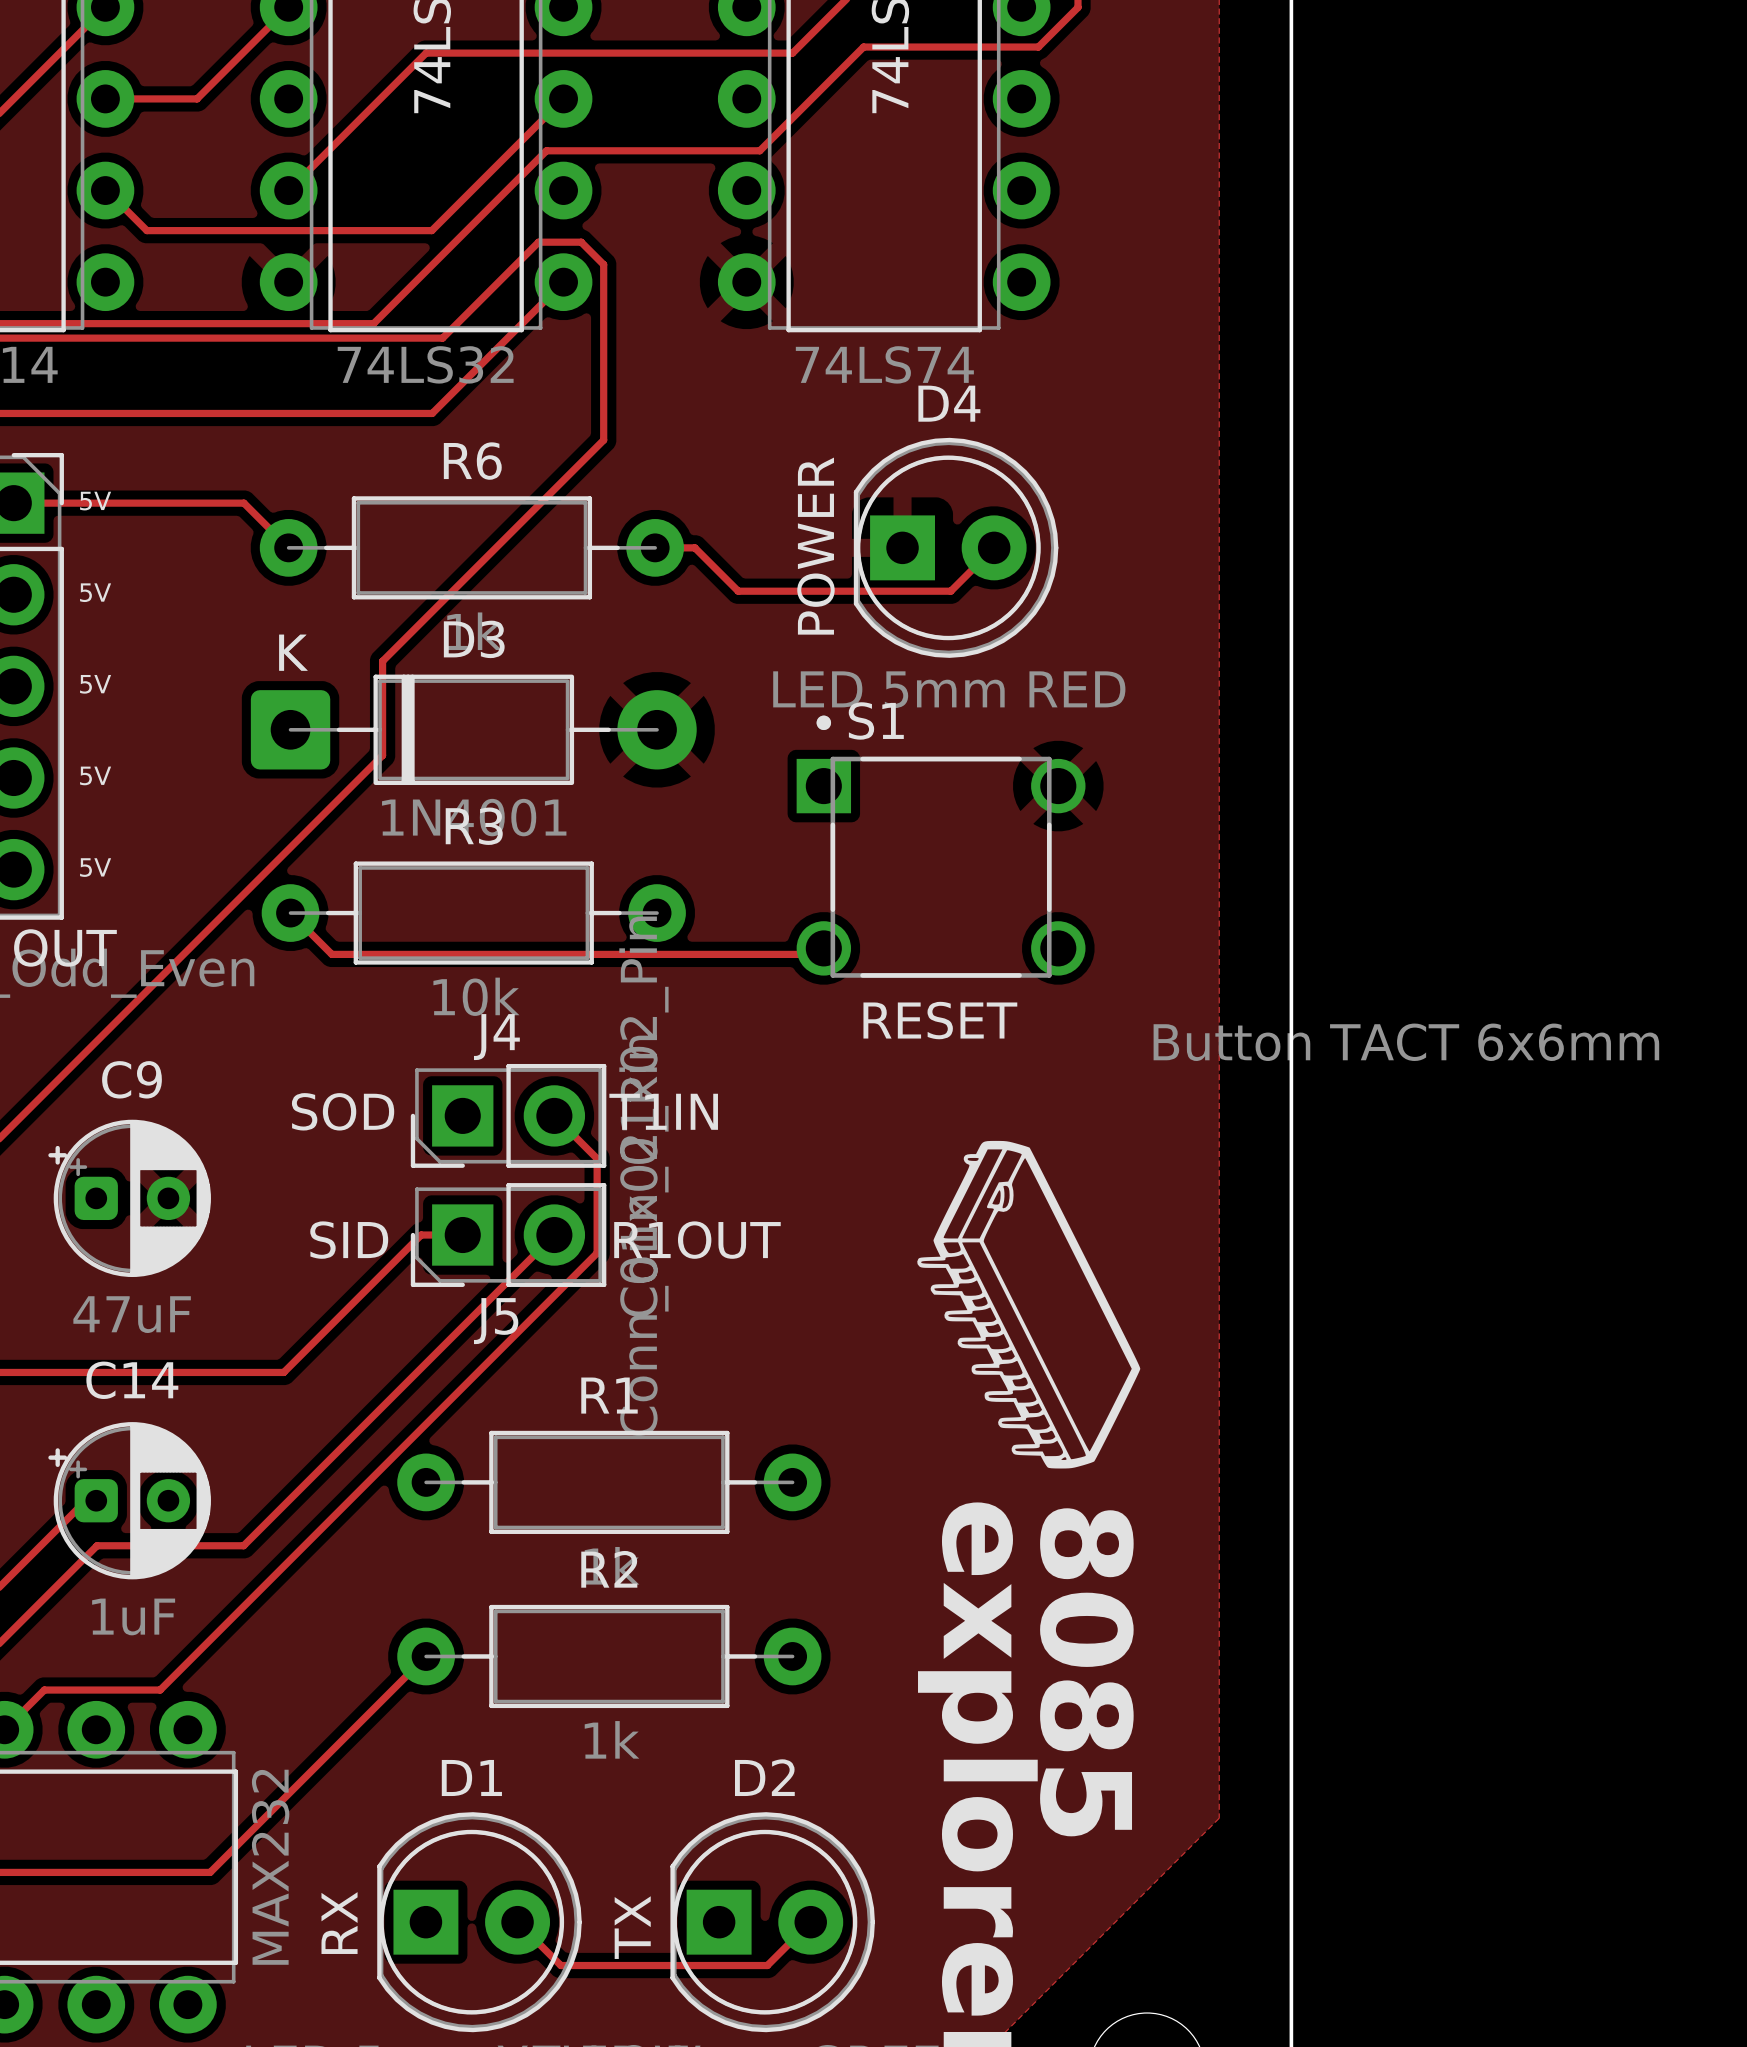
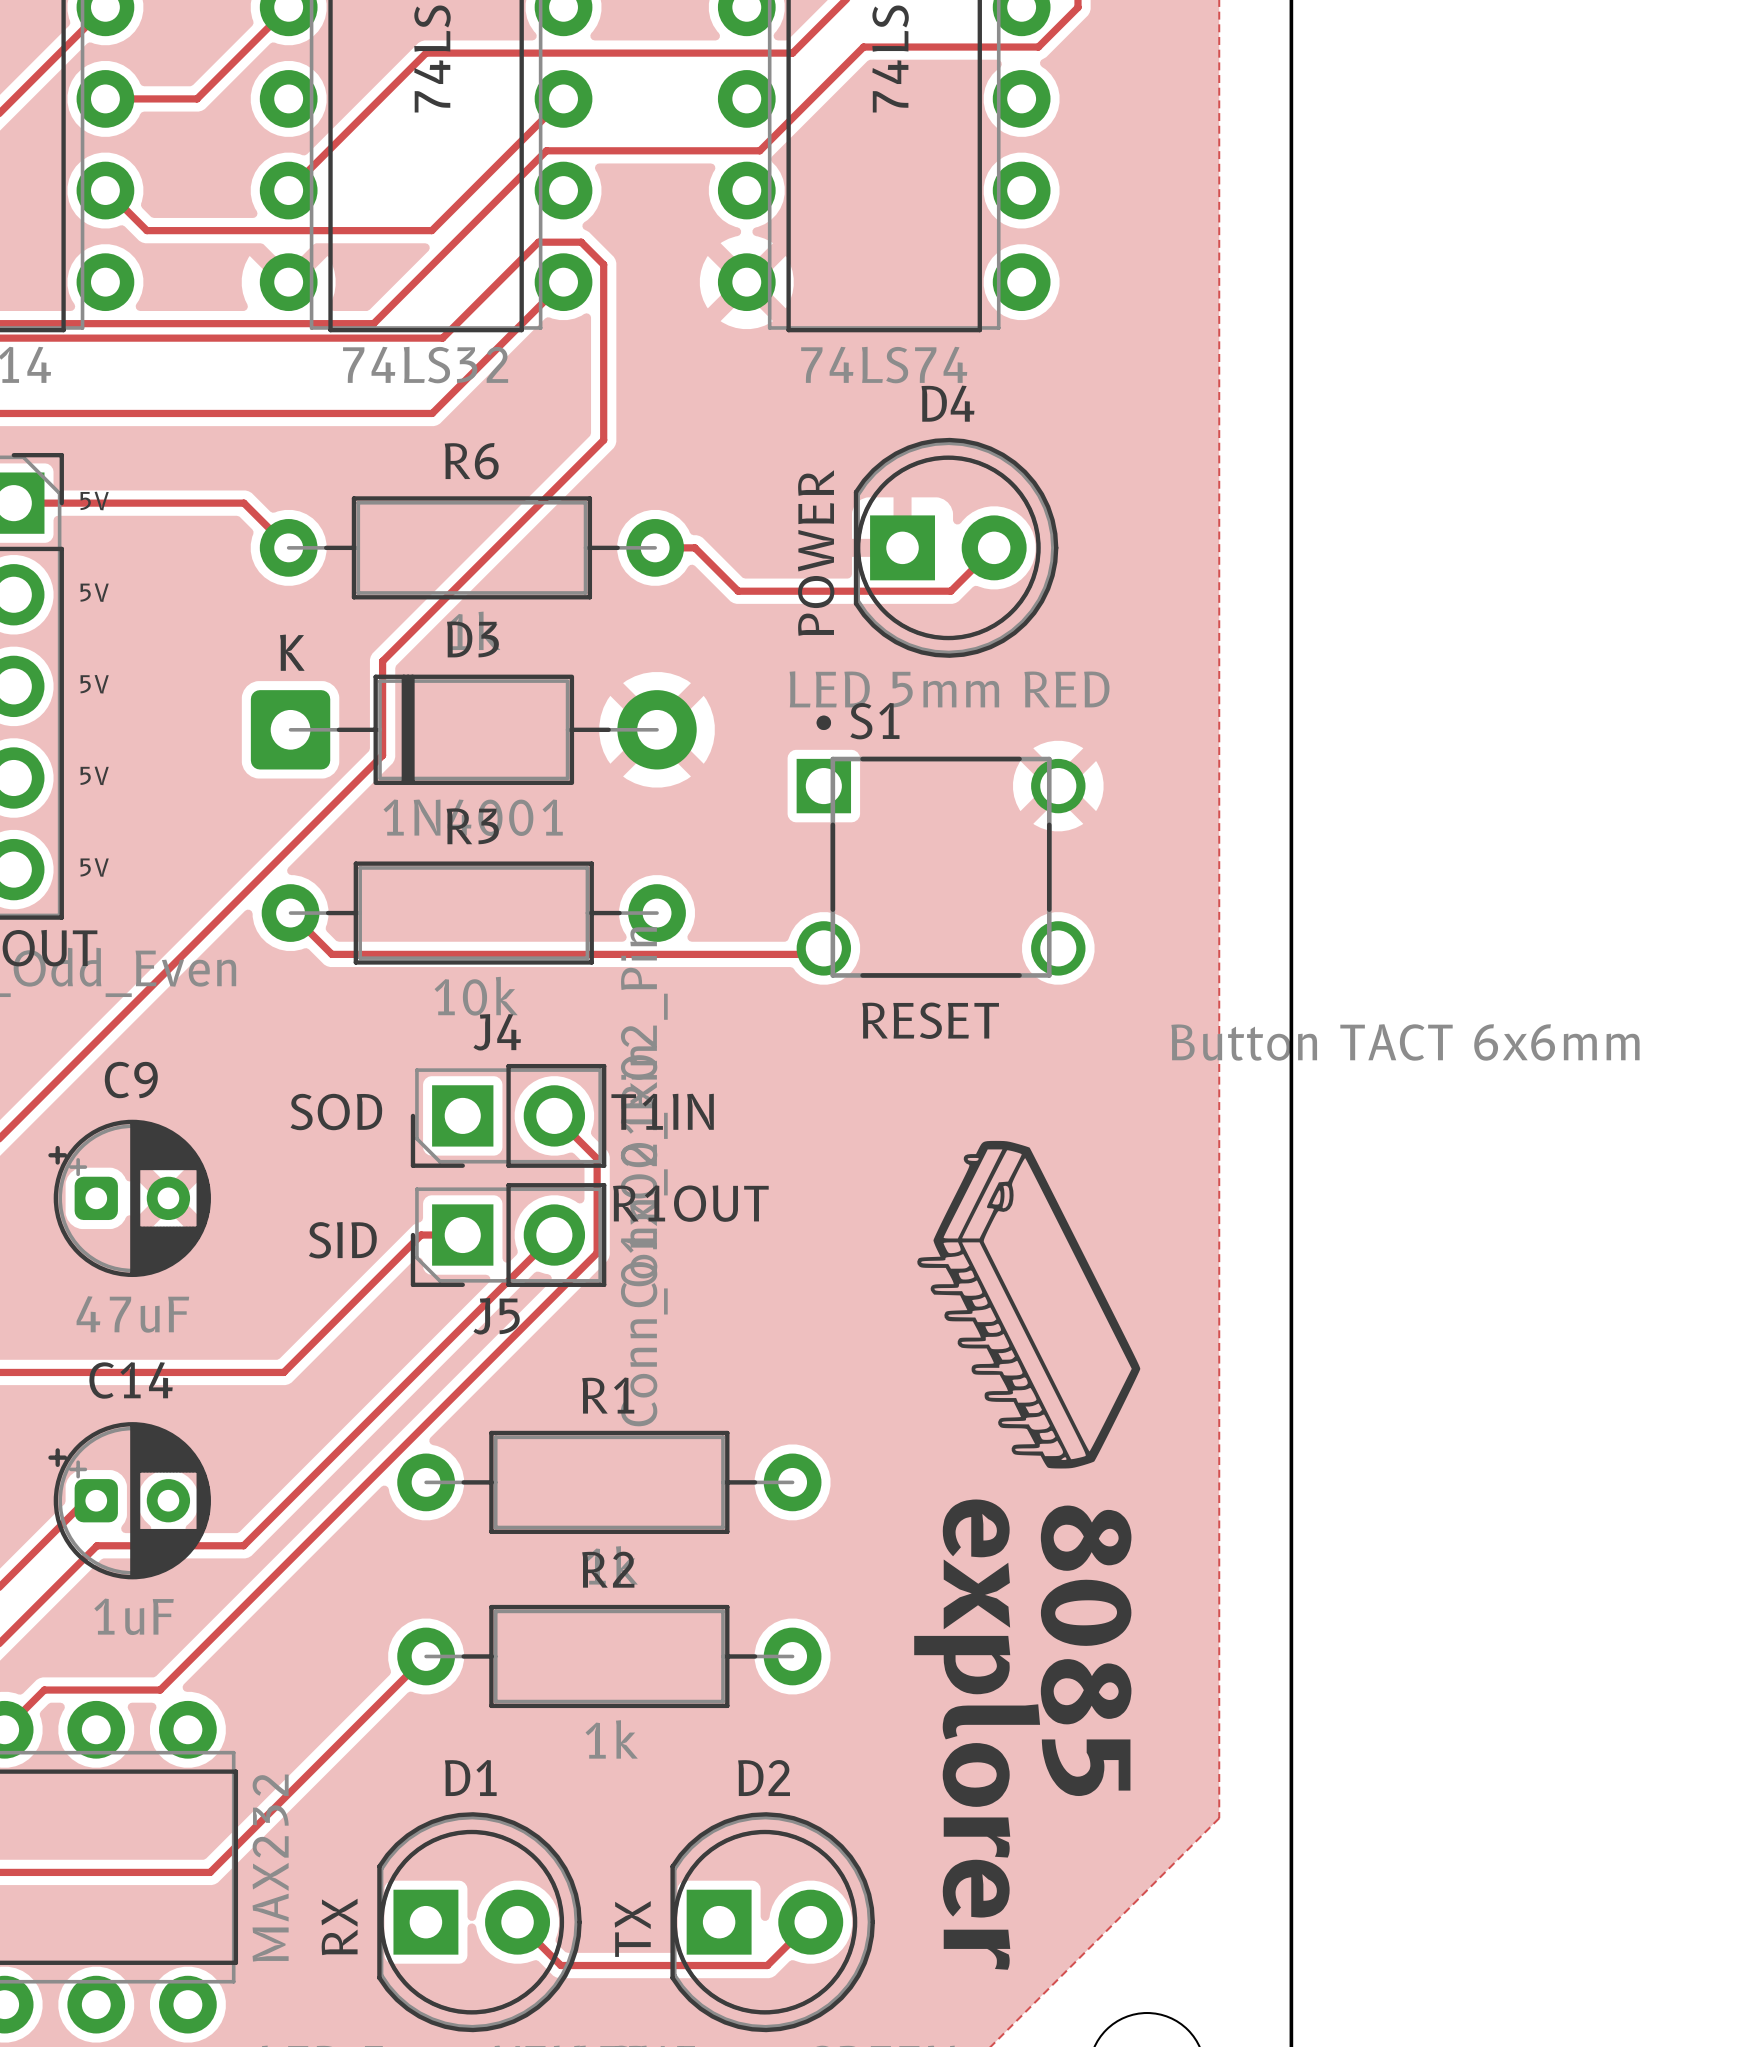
text position: R1OUT (697, 1240) -> R1OUT (690, 1203)

